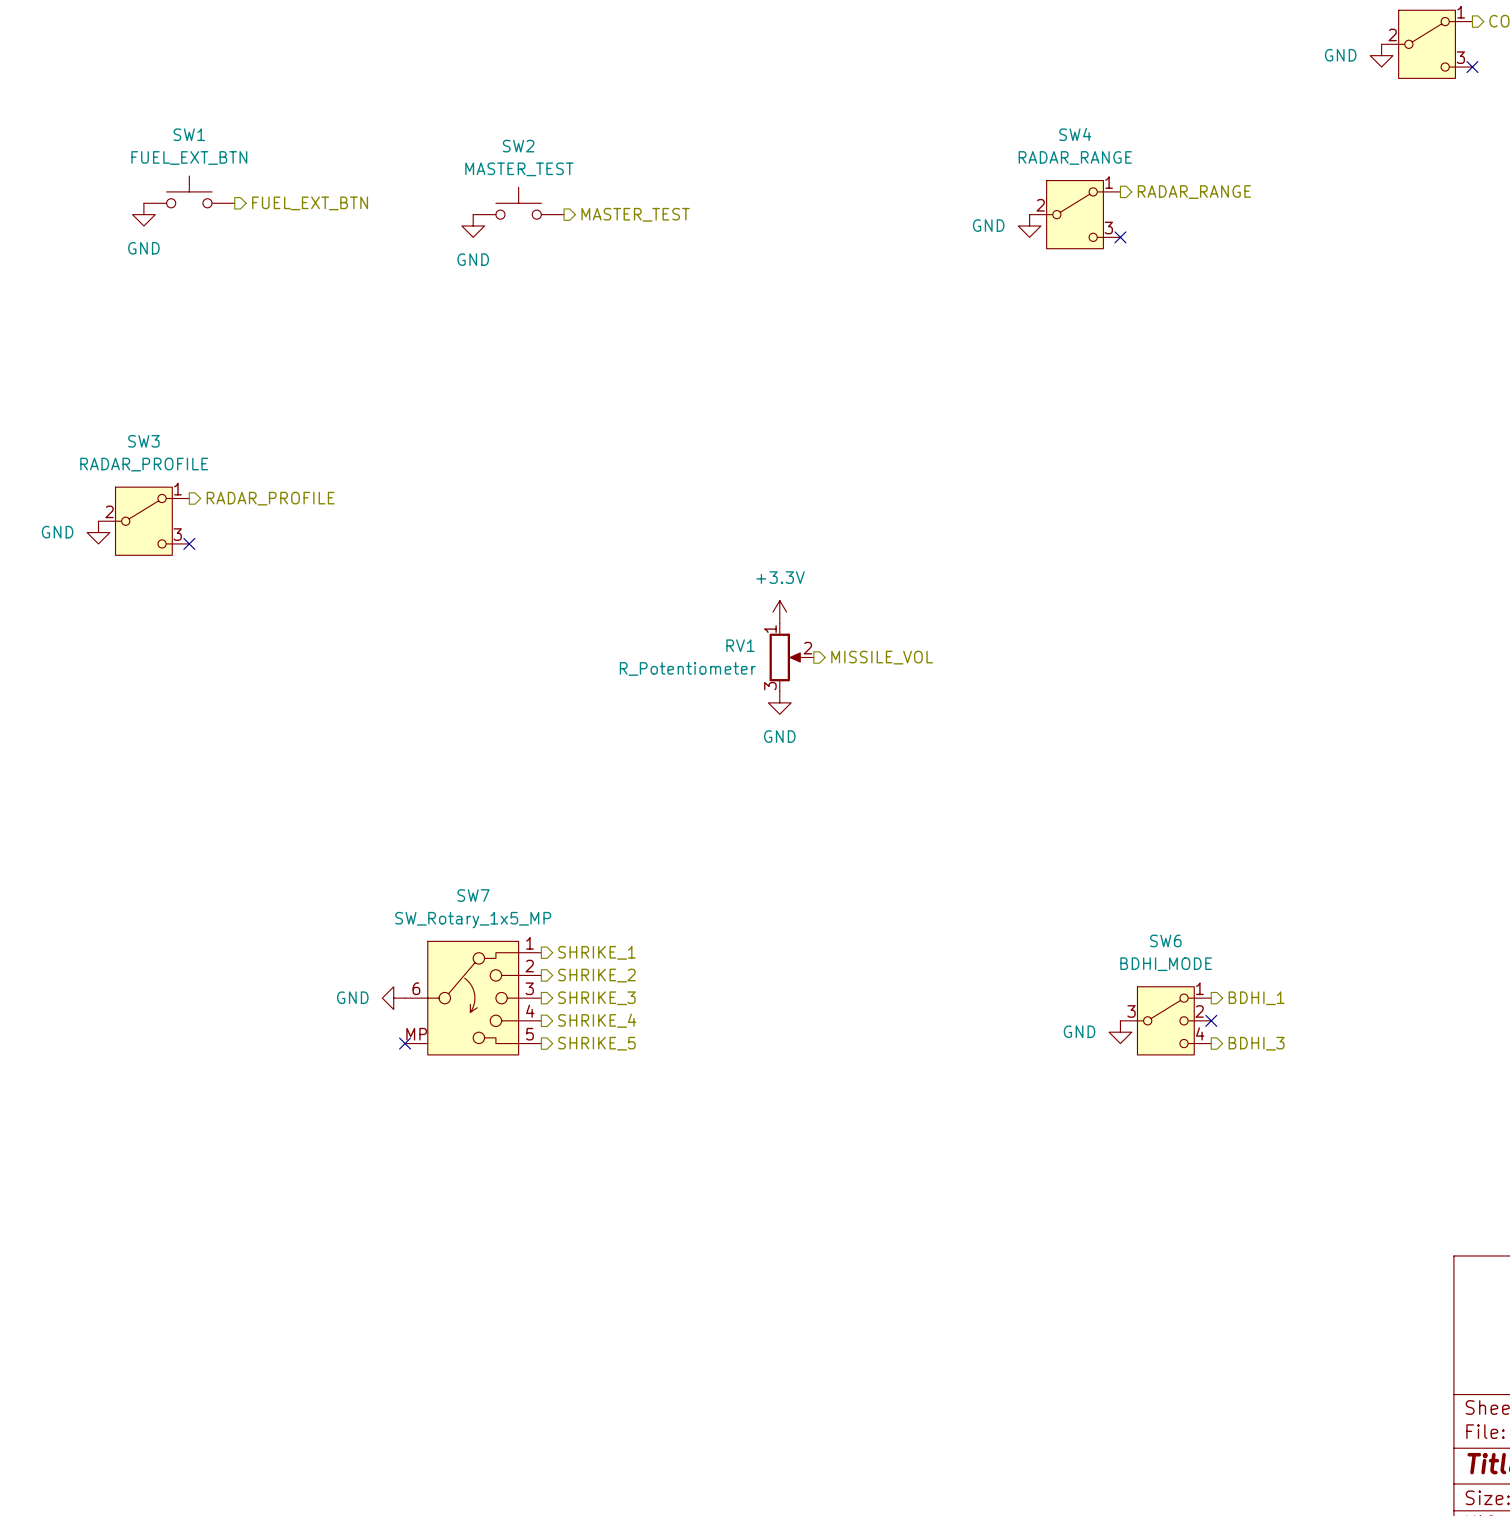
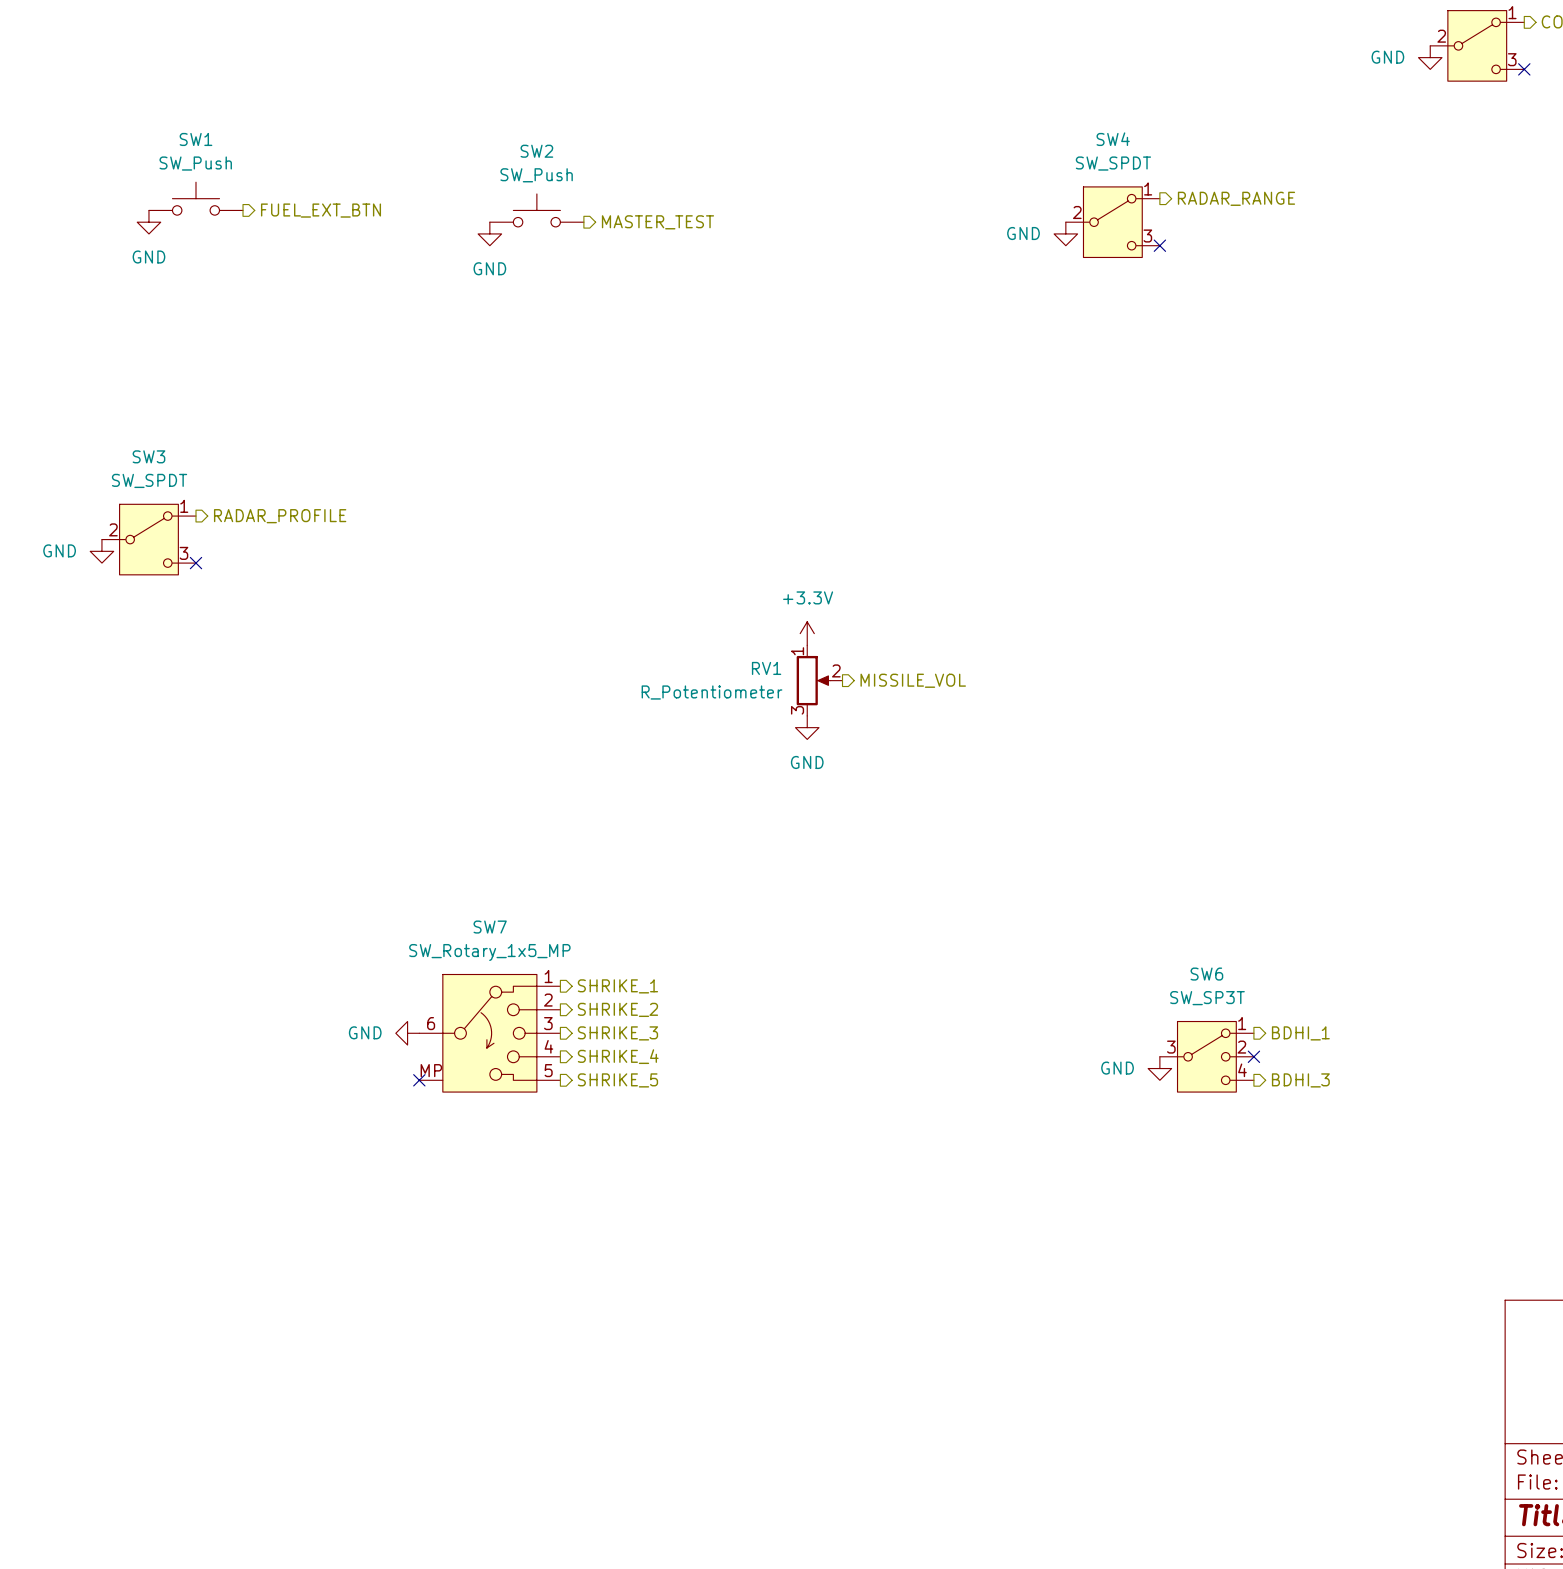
SW1 value: FUEL_EXT_BTN (189, 157) -> SW_Push (195, 163)
SW4 value: RADAR_RANGE (1075, 157) -> SW_SPDT (1113, 163)
SW2 value: MASTER_TEST (519, 169) -> SW_Push (536, 175)
SW3 value: RADAR_PROFILE (144, 464) -> SW_SPDT (149, 480)
SW6 value: BDHI_MODE (1166, 964) -> SW_SP3T (1207, 998)

